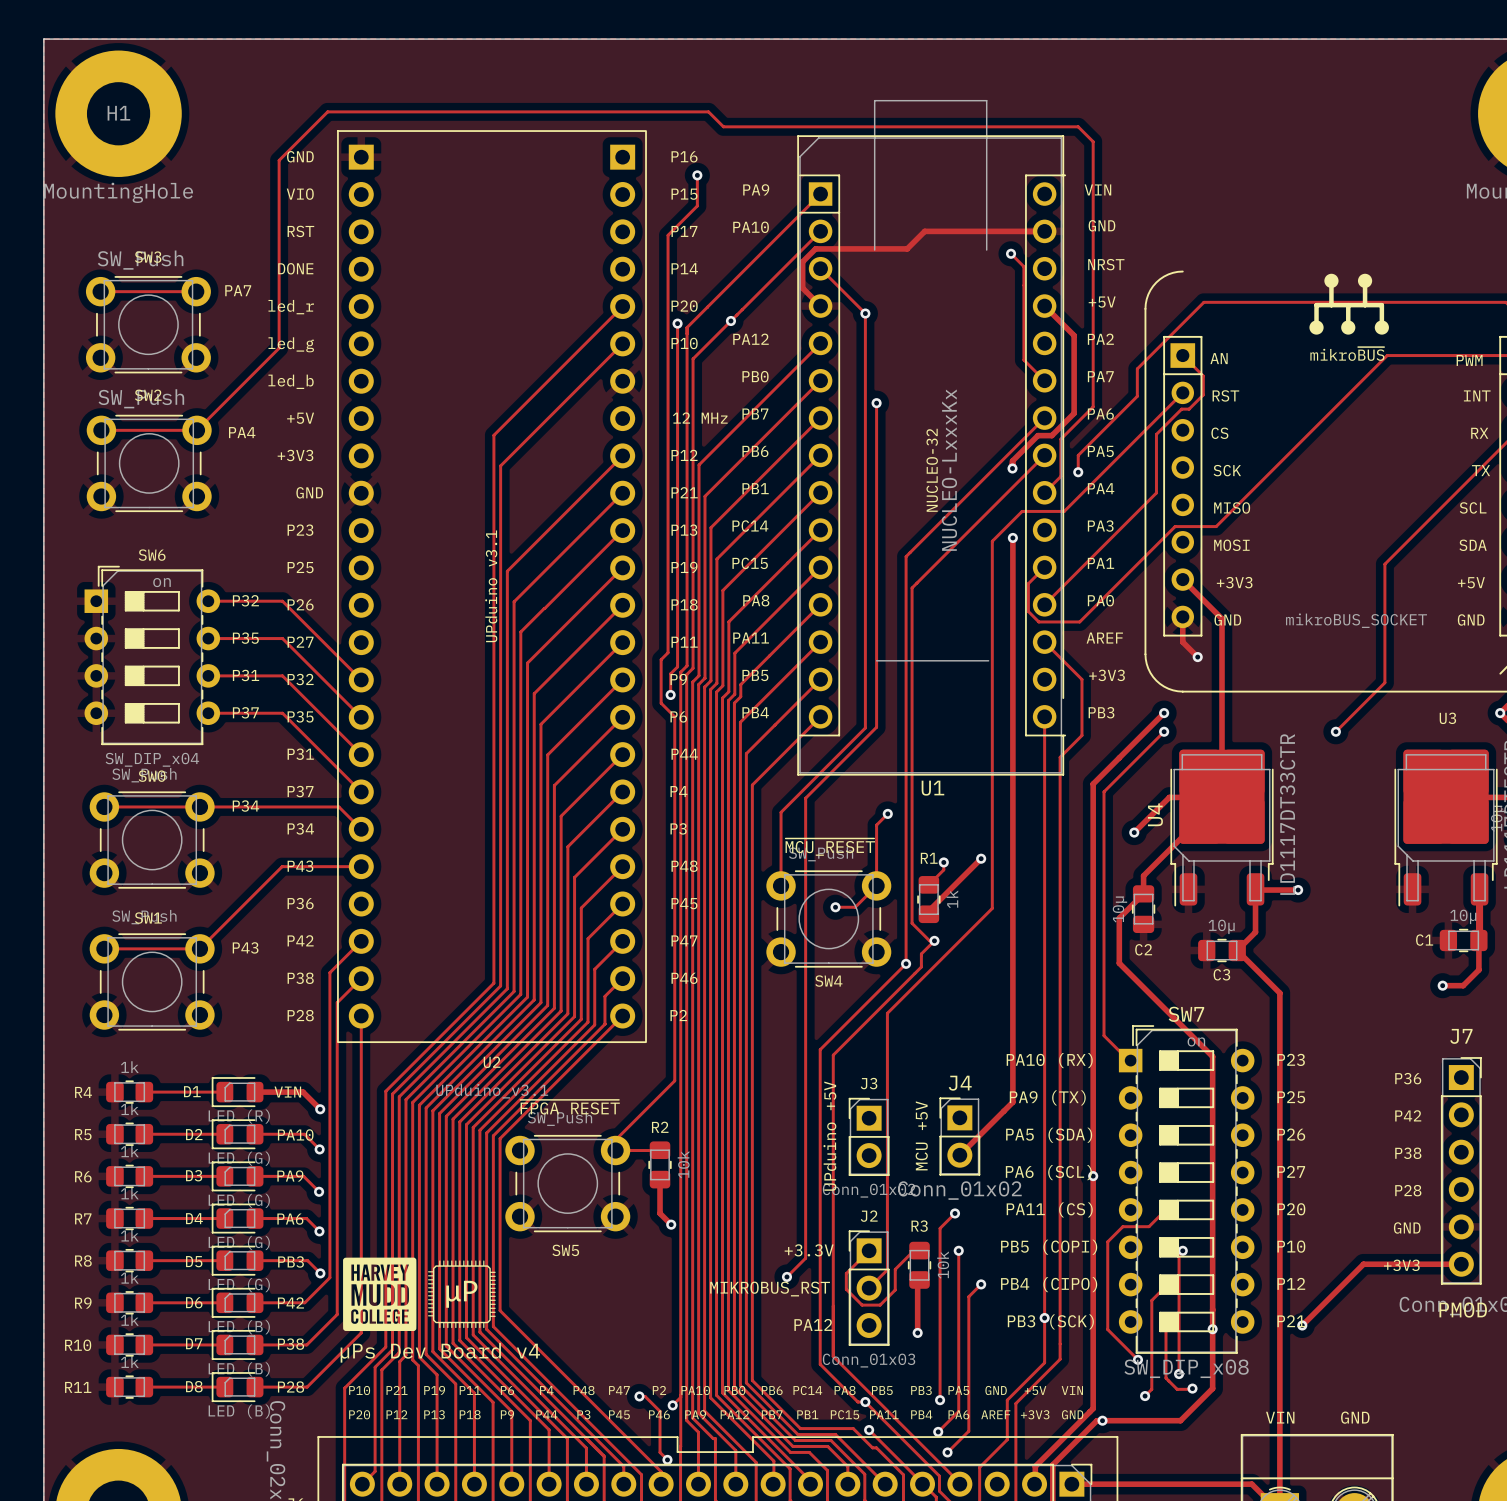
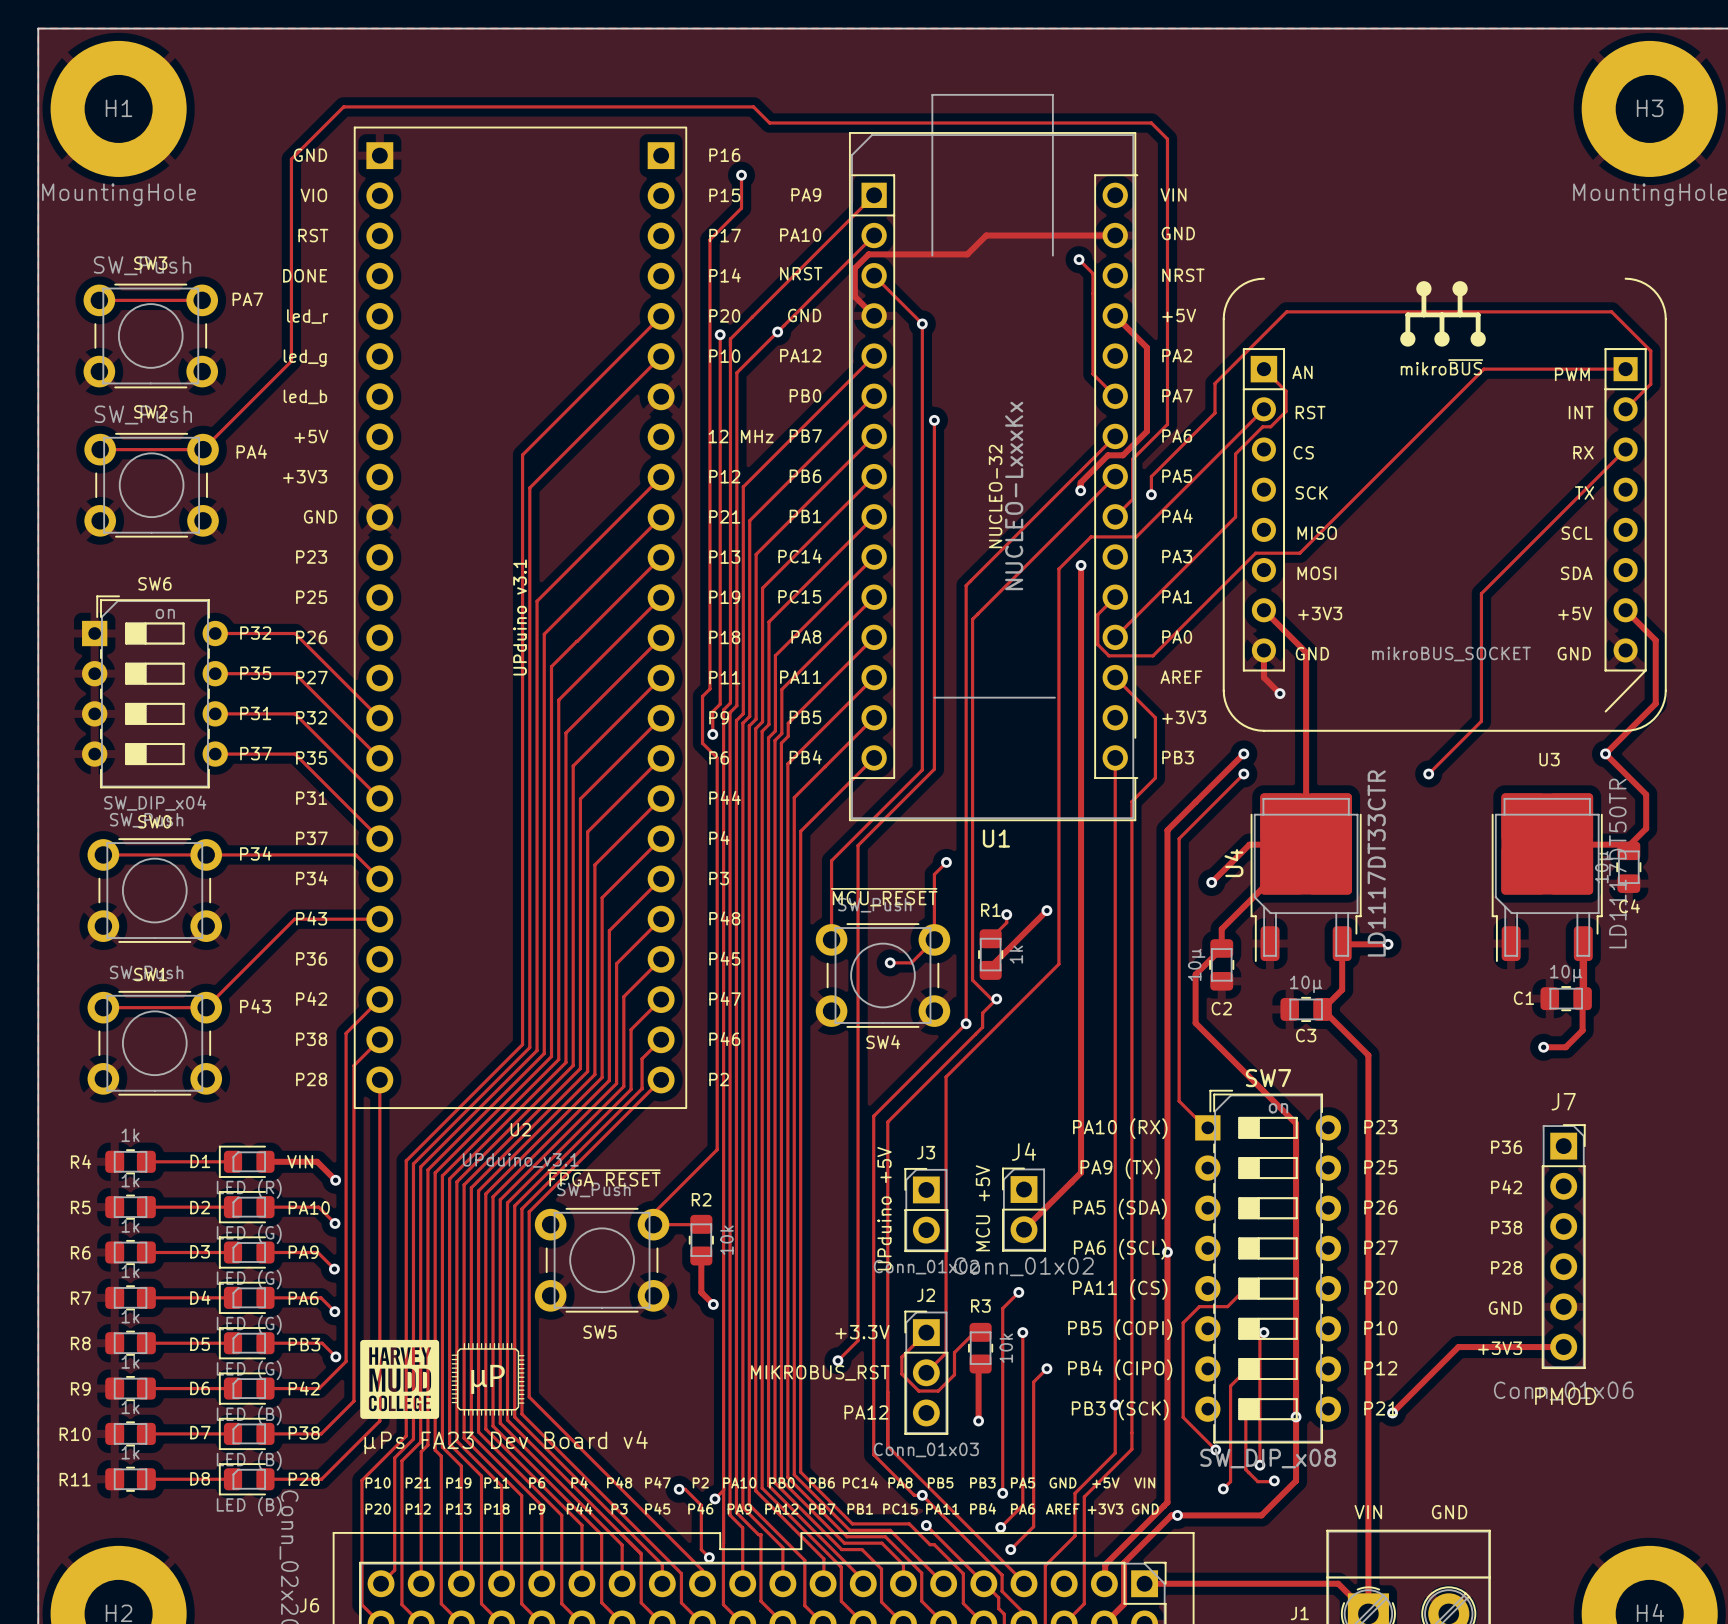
U1 footprint: [797, 99, 1067, 776] -> [848, 94, 1139, 822]
text: µPs Dev Board v4 (440, 1352) -> µPs FA23 Dev Board v4 (506, 1442)

